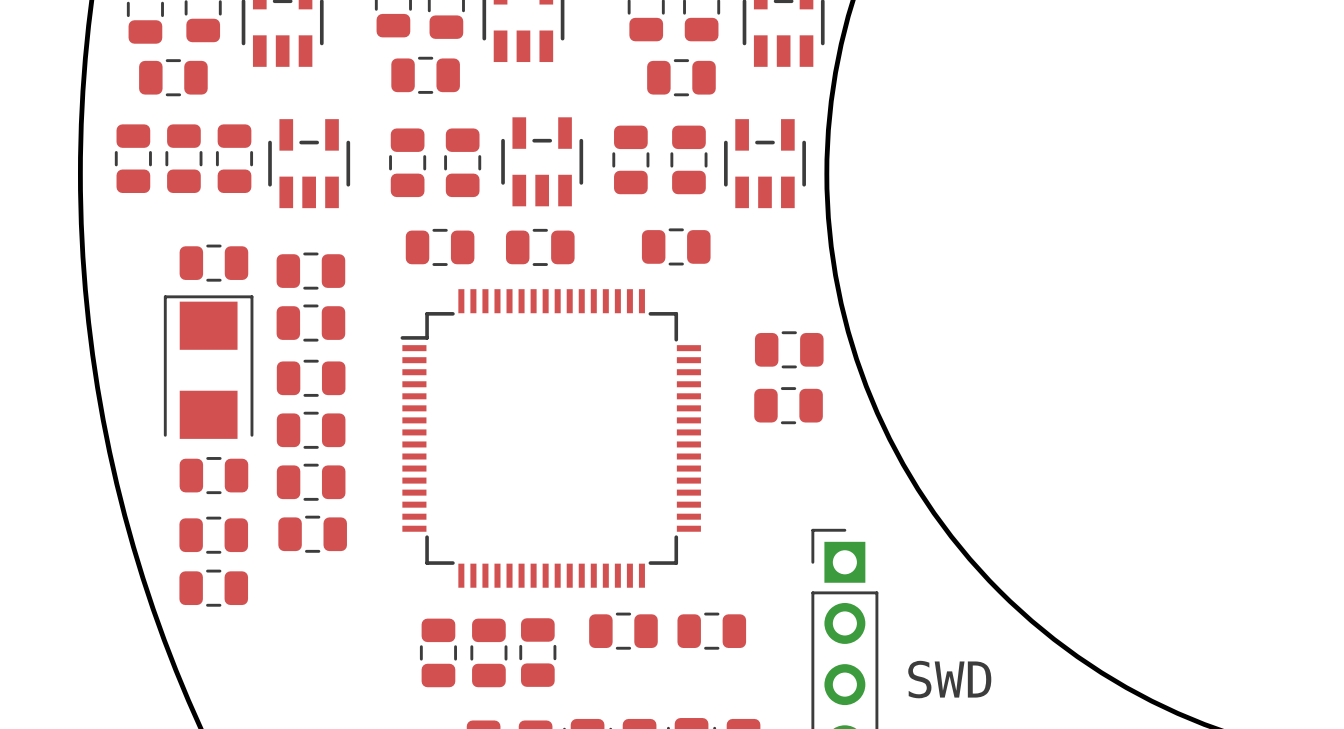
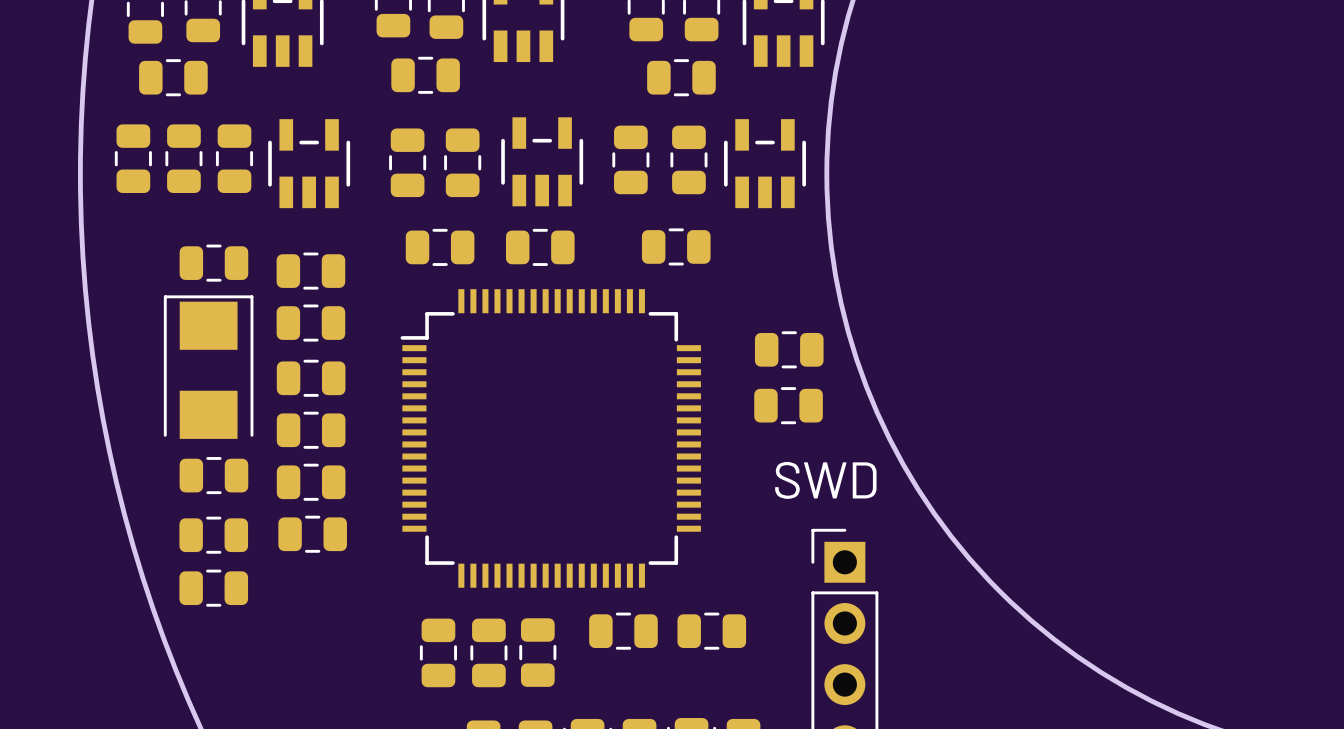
text position: SWD (949, 679) -> SWD (825, 480)

